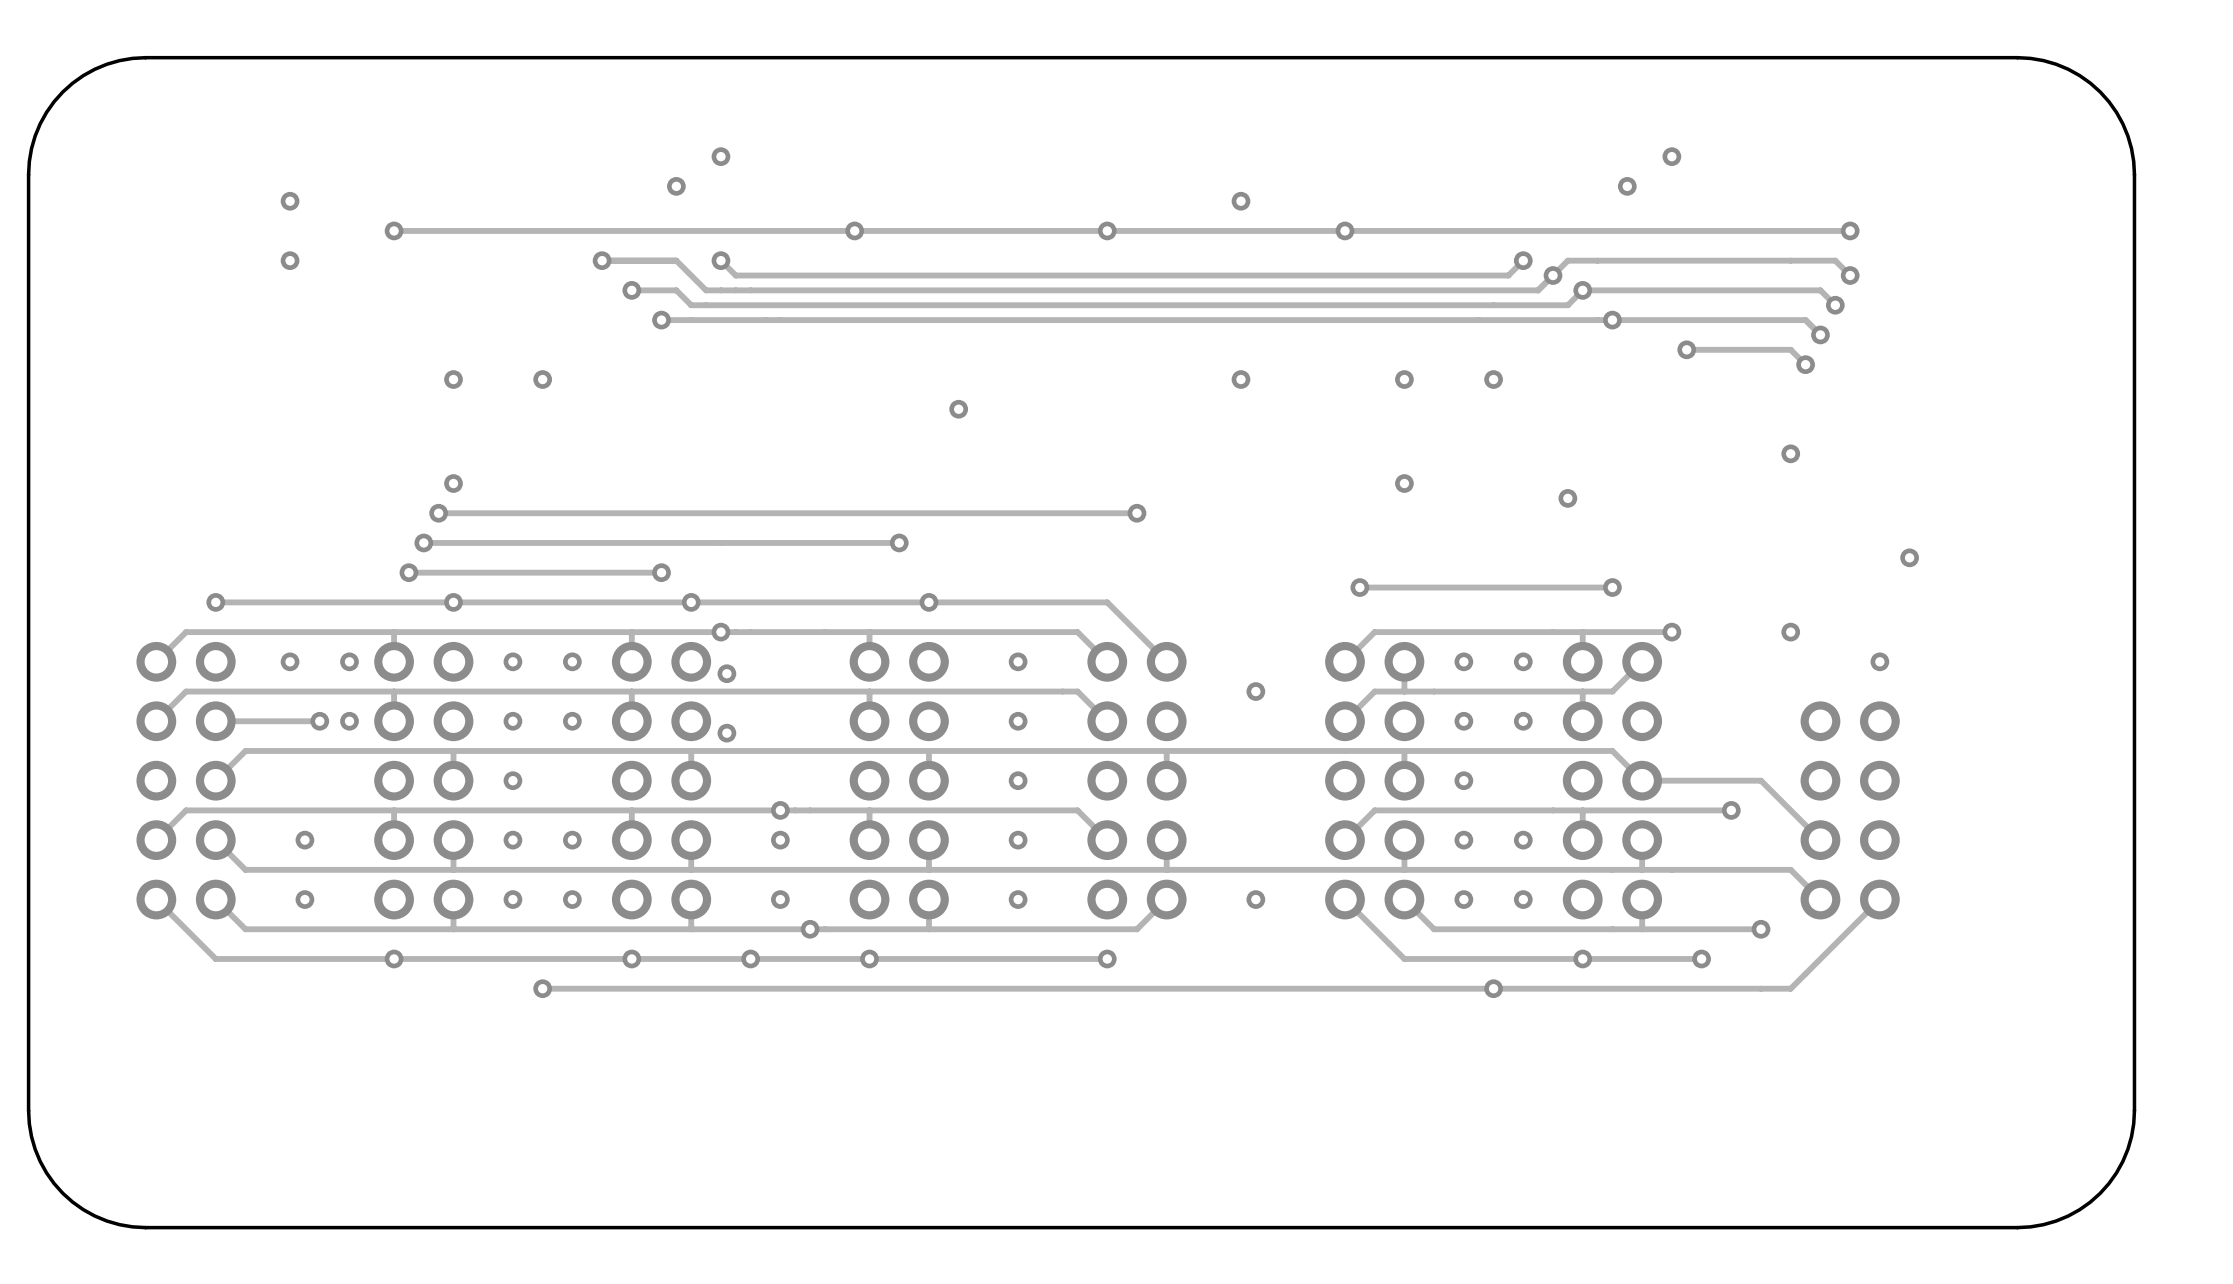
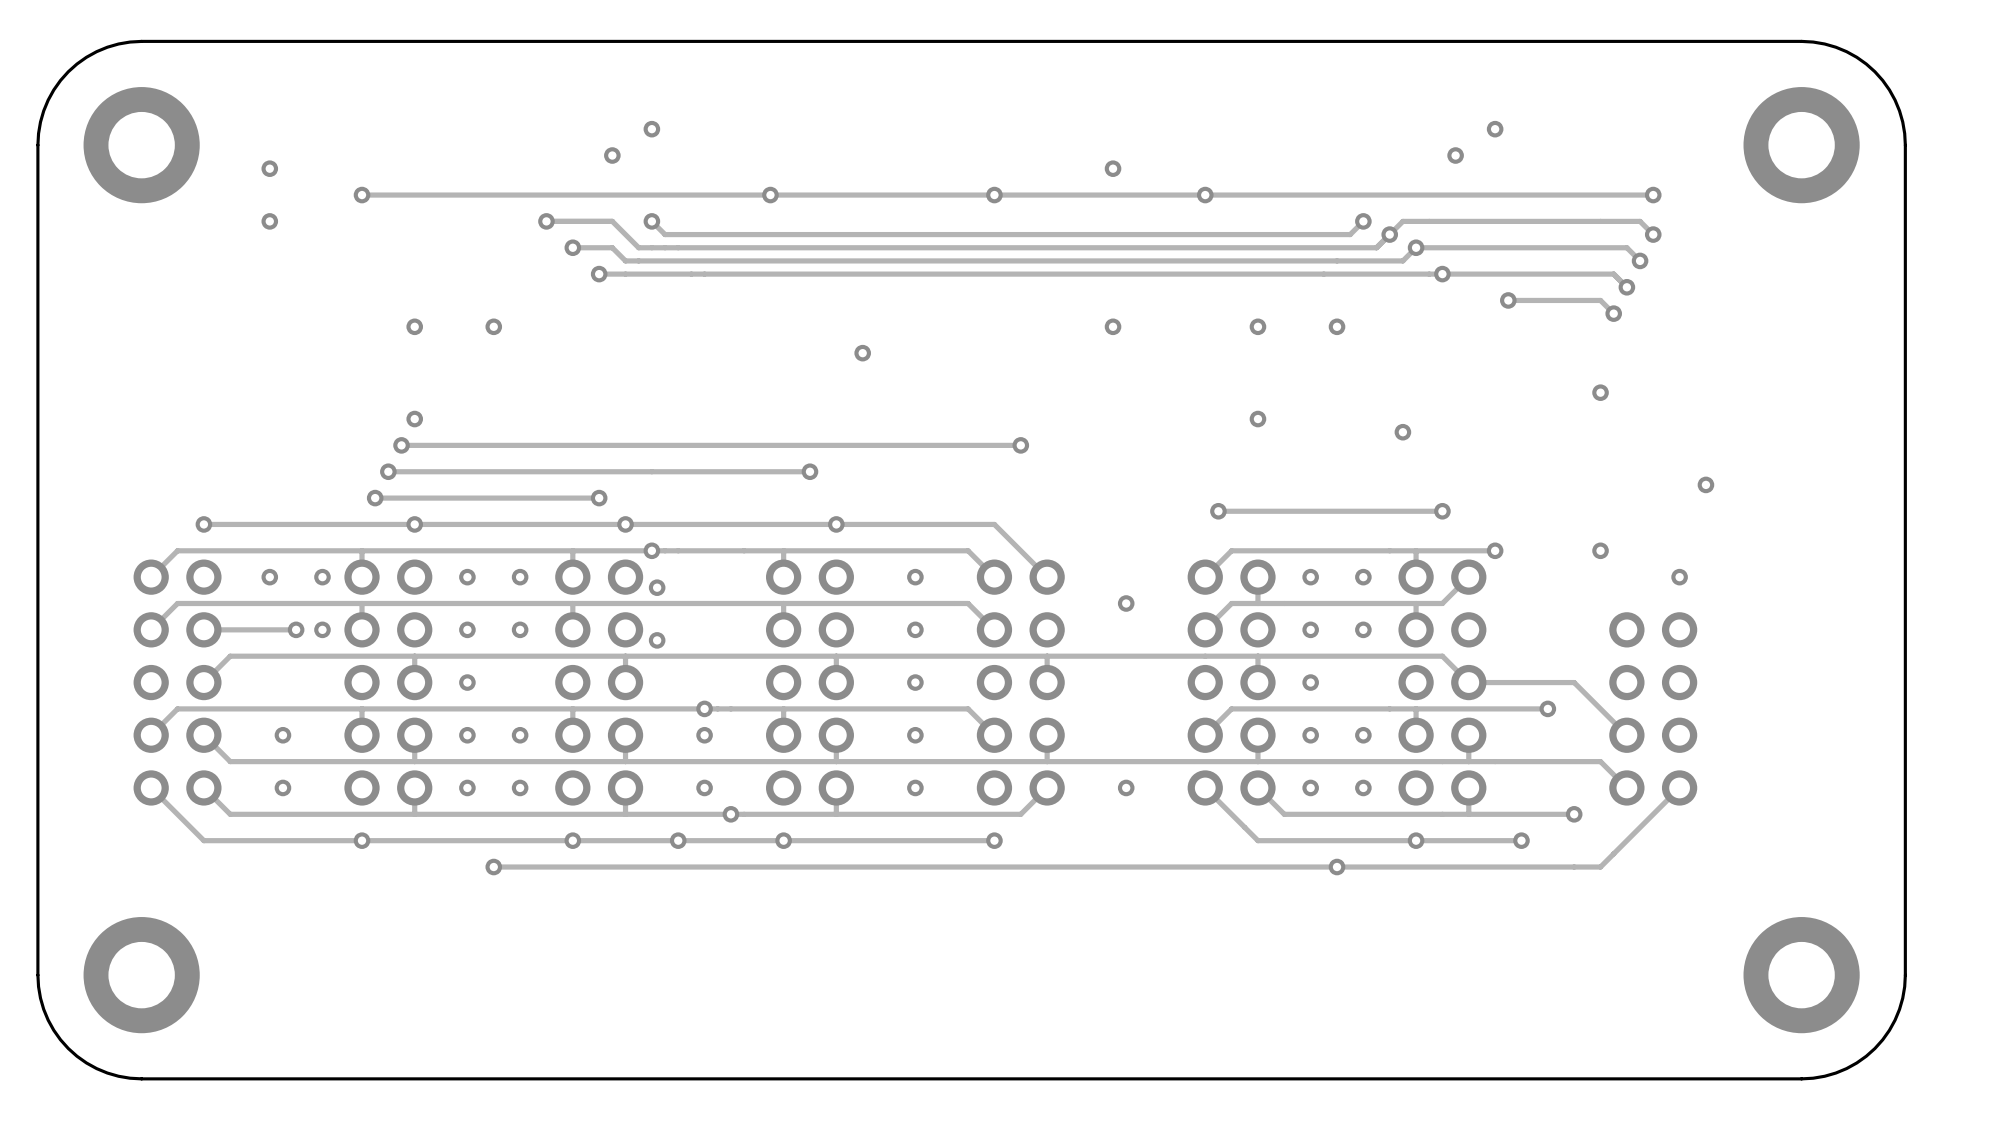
part: none -> (141, 145)
part: none -> (1801, 145)
part: none -> (141, 975)
part: none -> (1801, 975)

